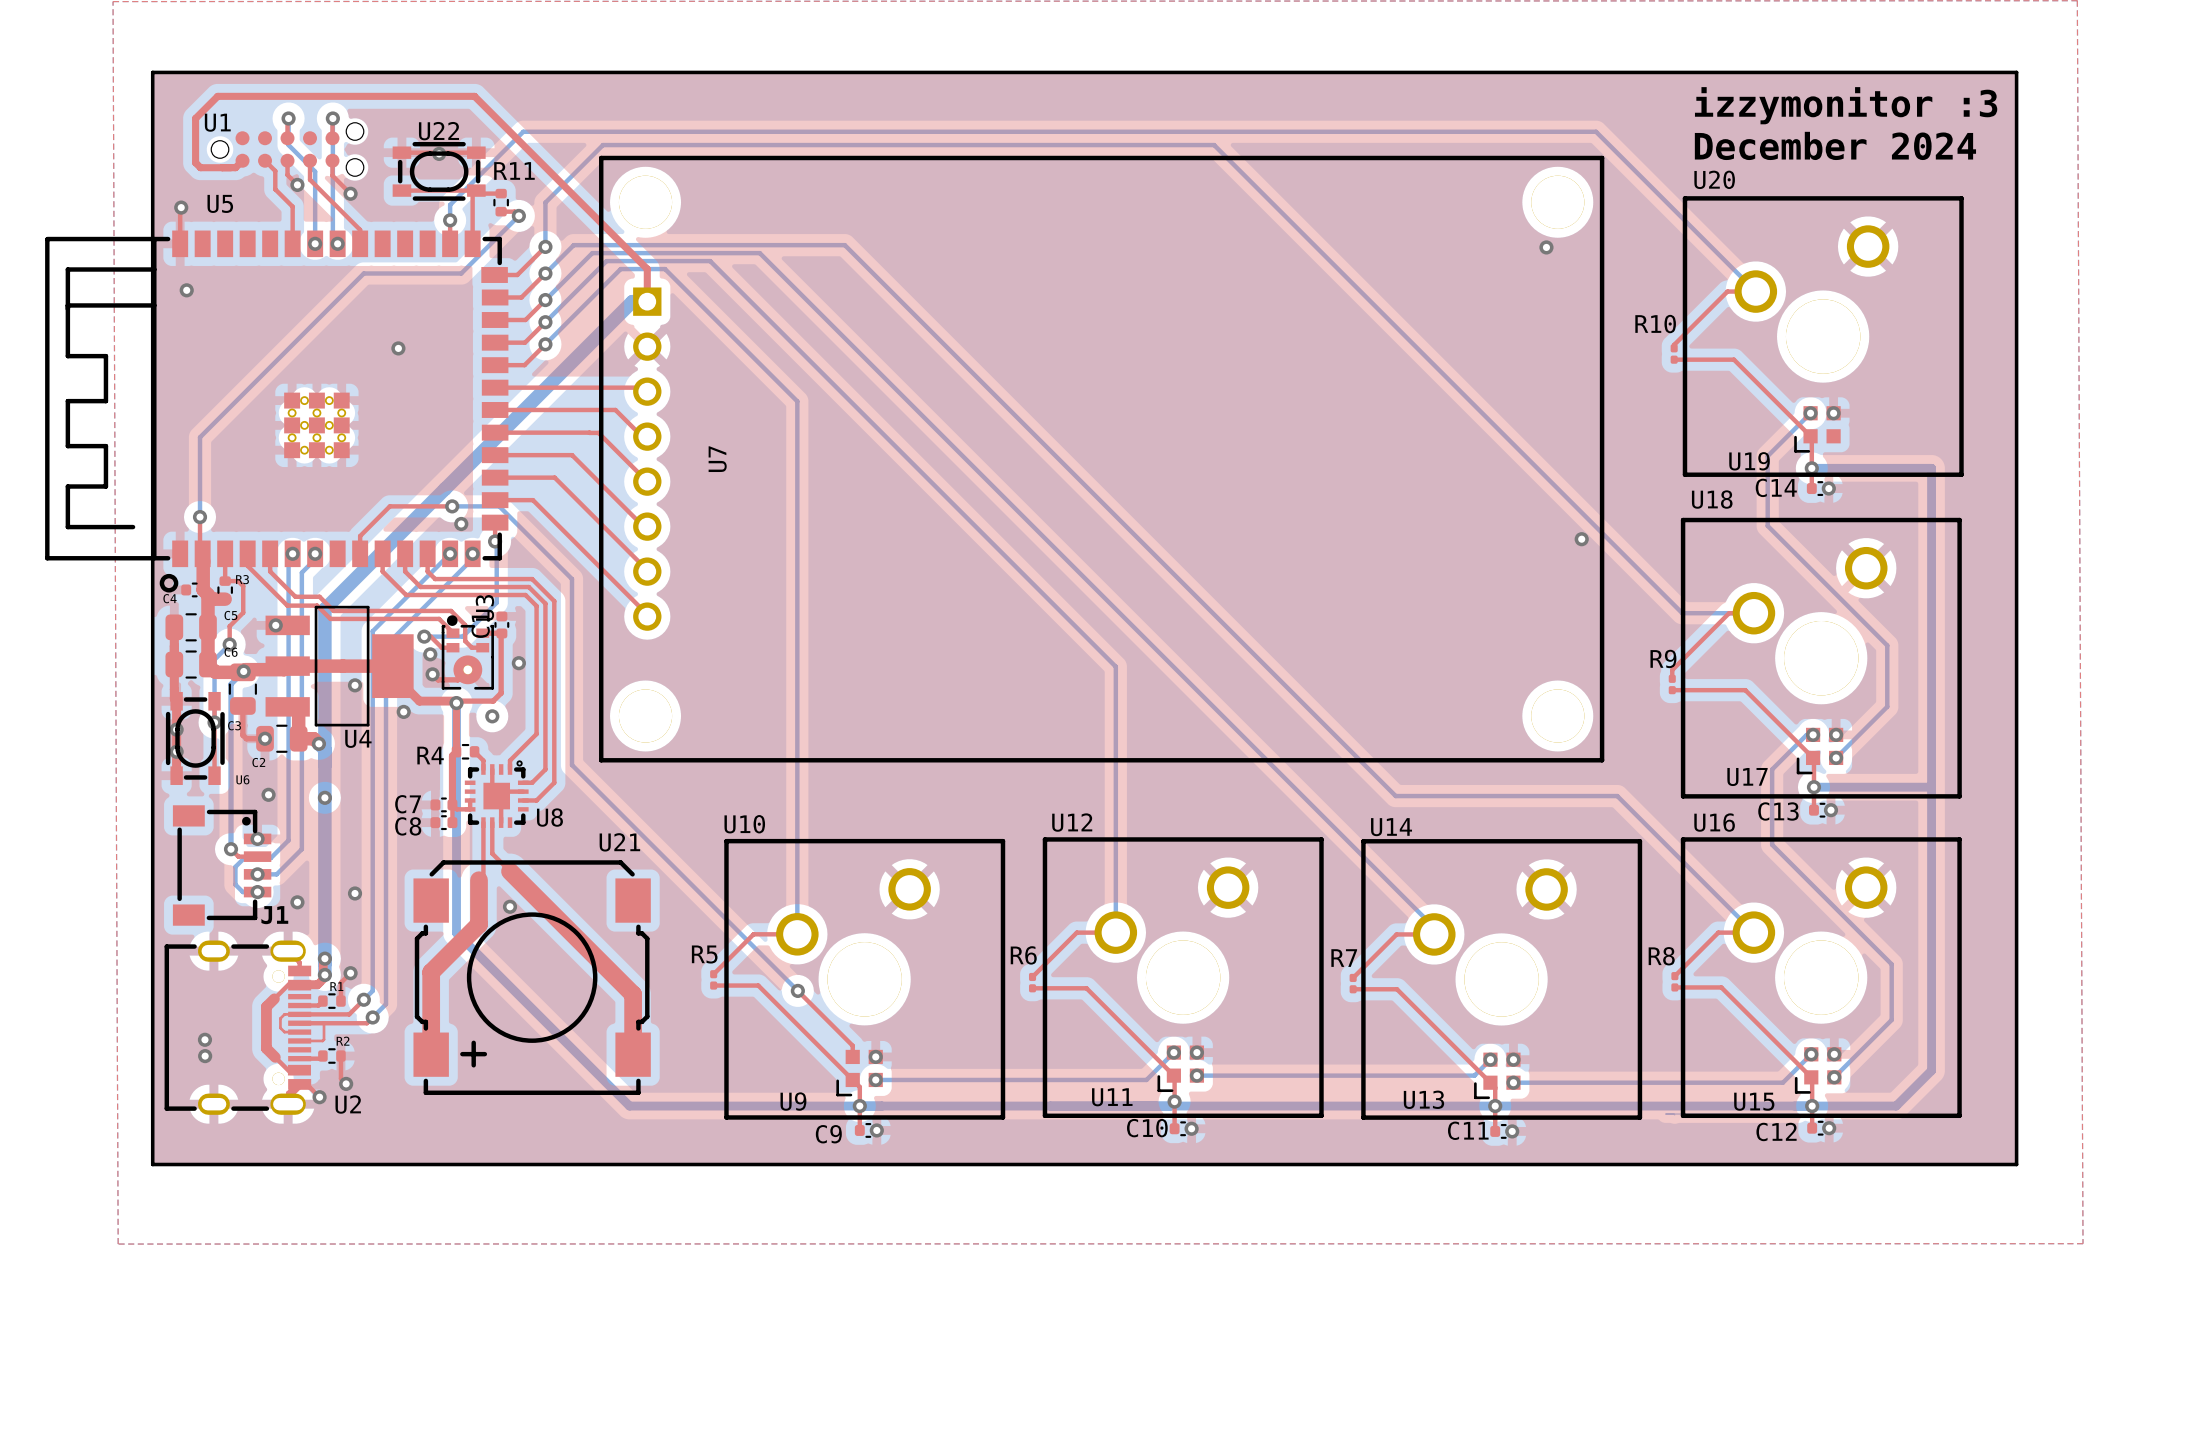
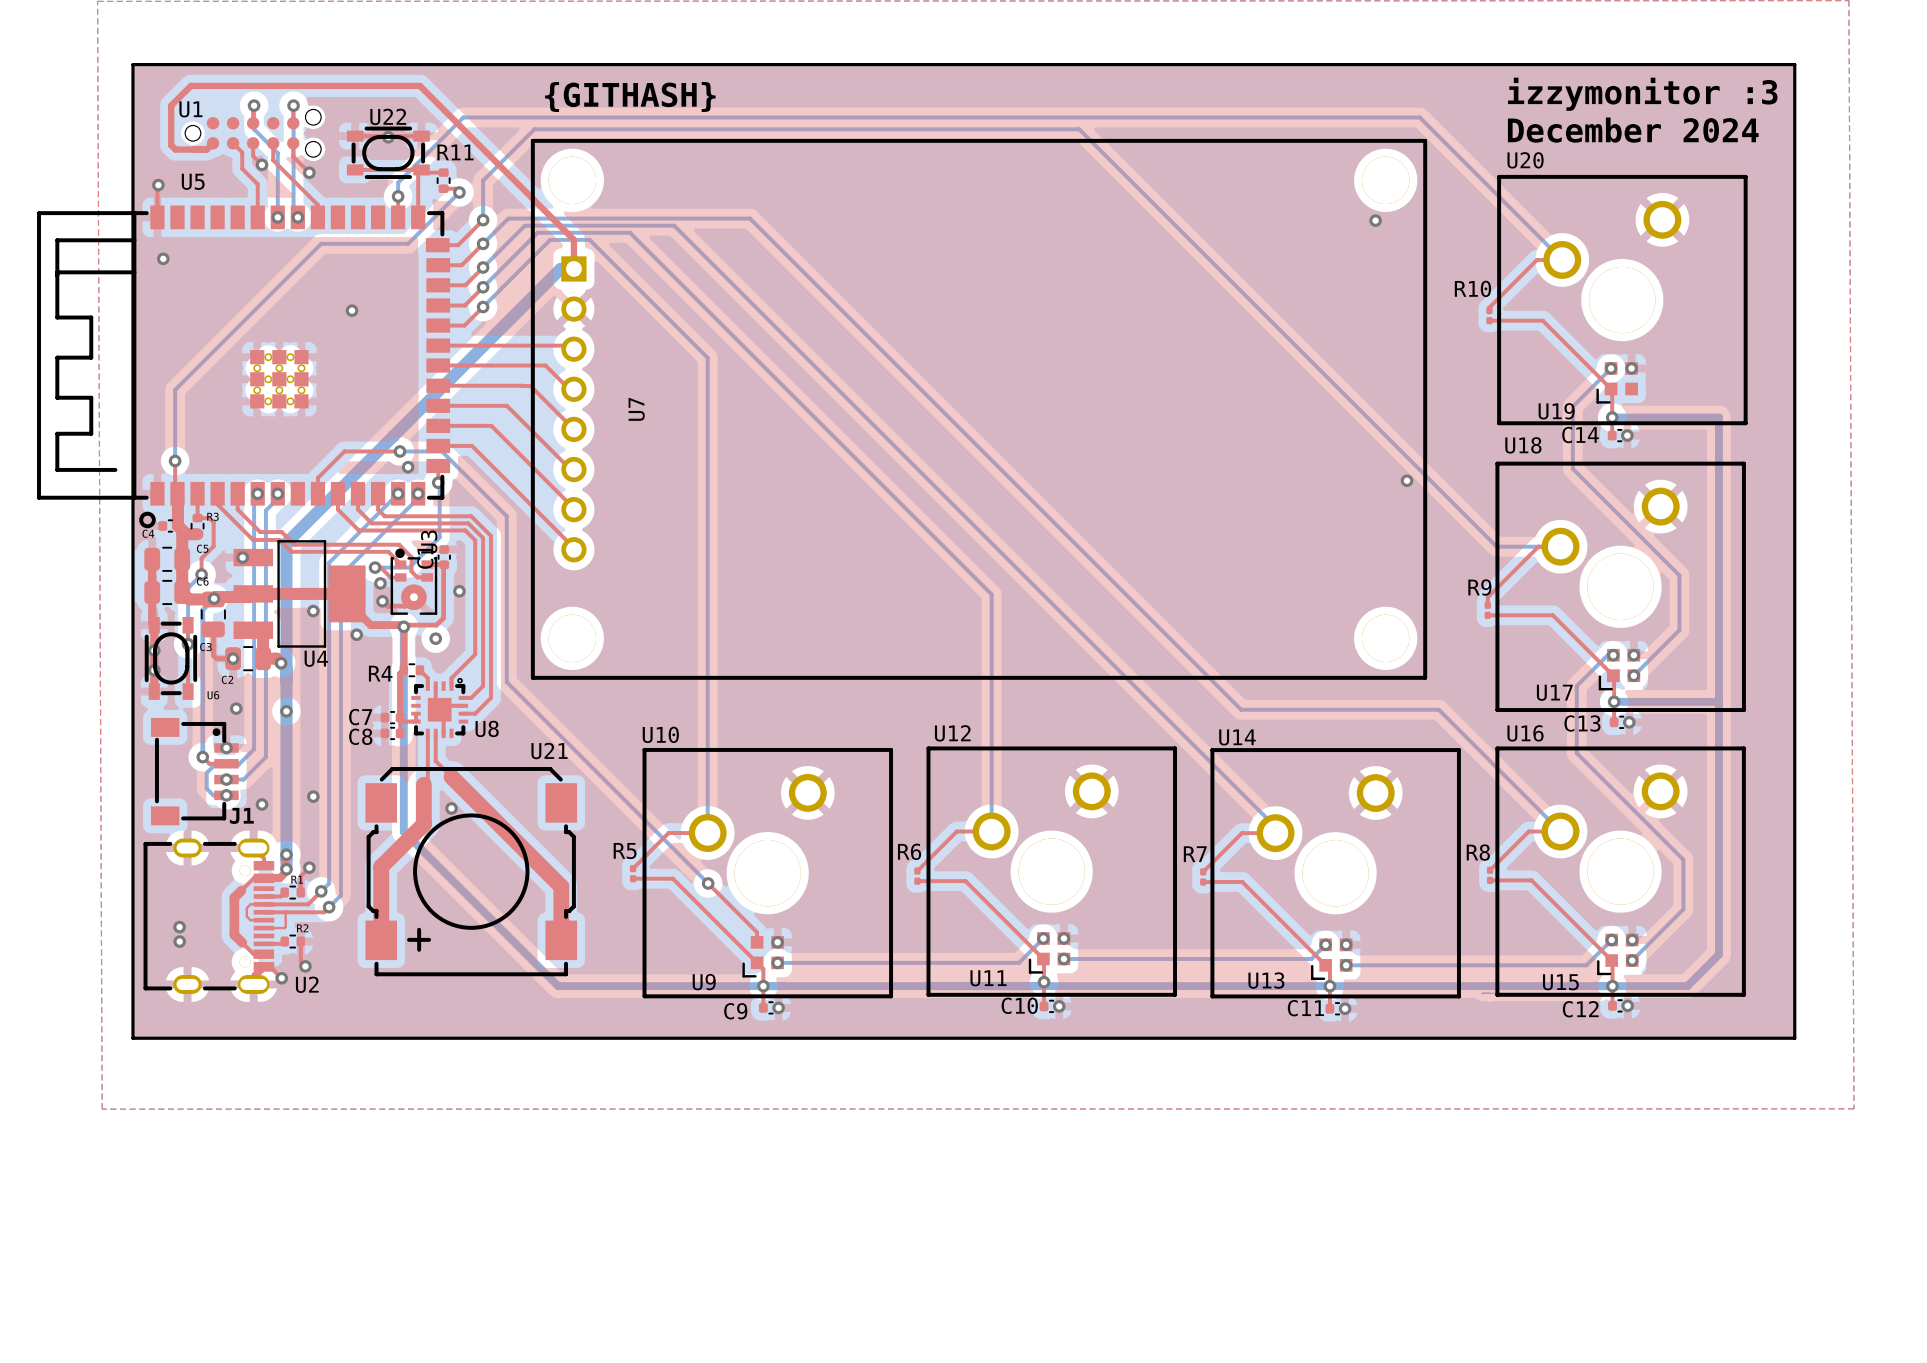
text: none -> {GITHASH} (630, 97)

